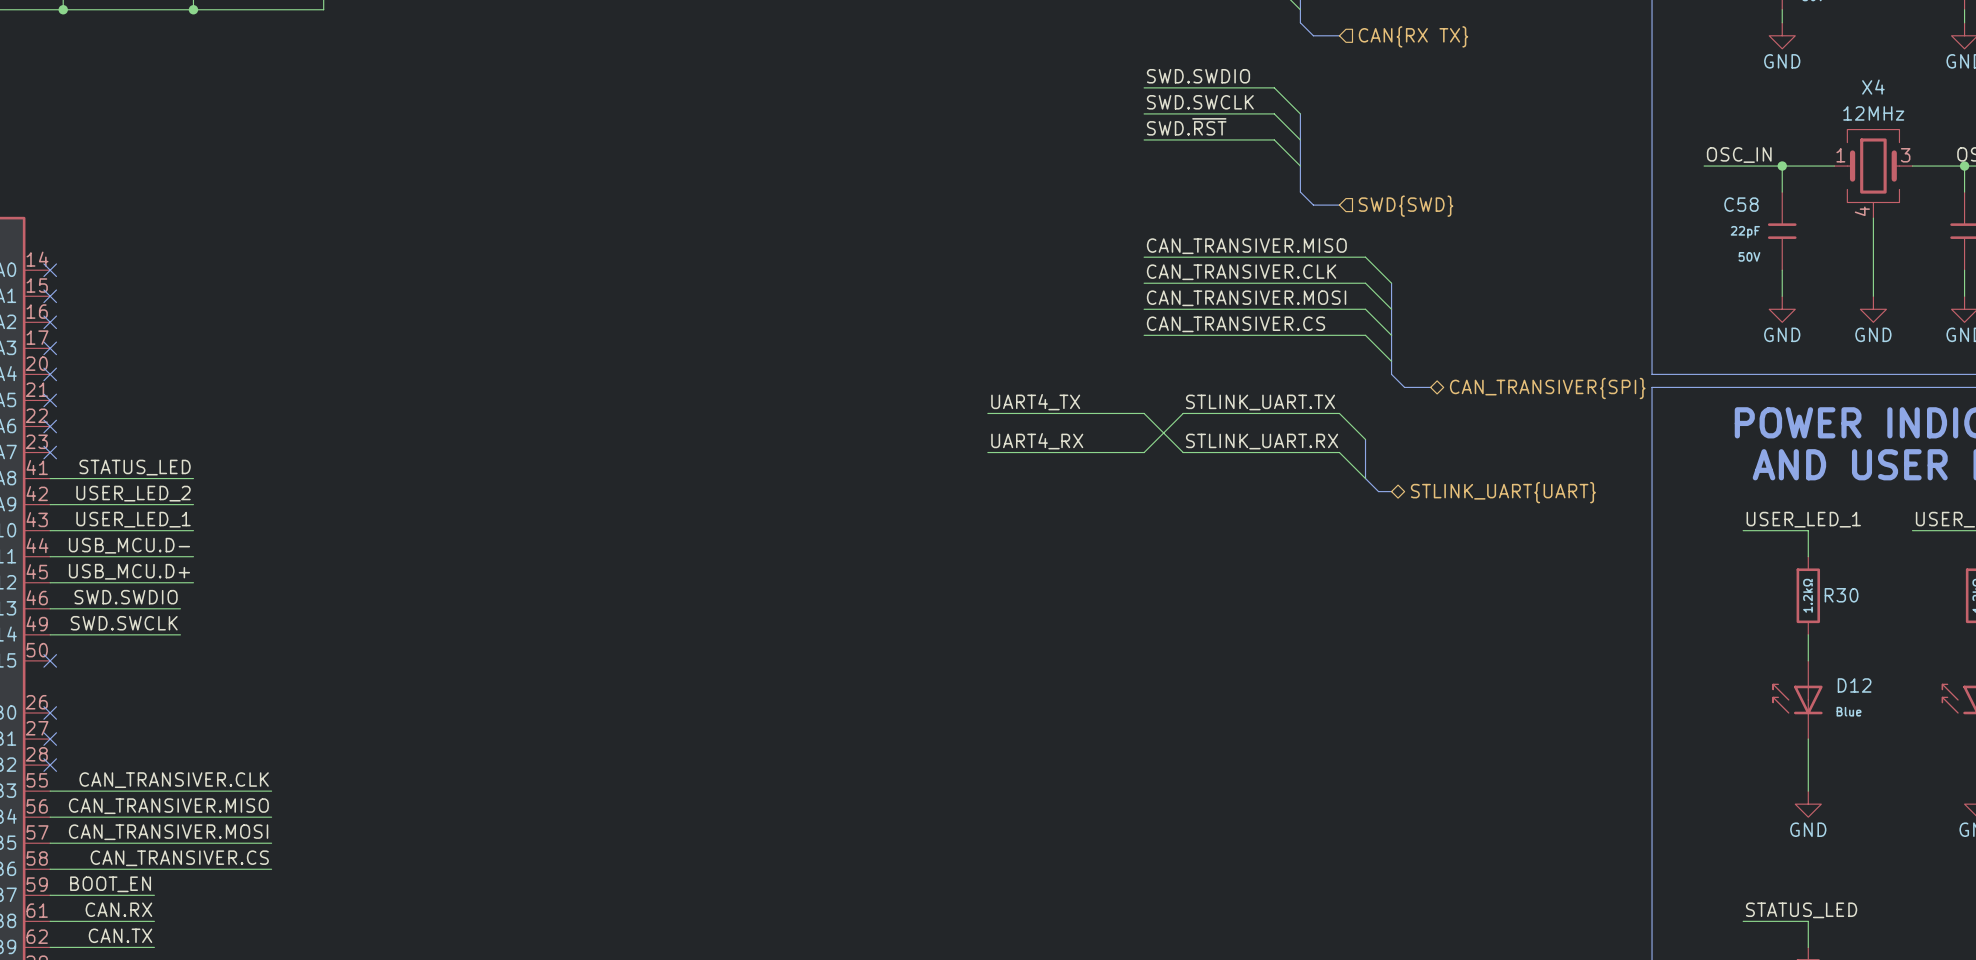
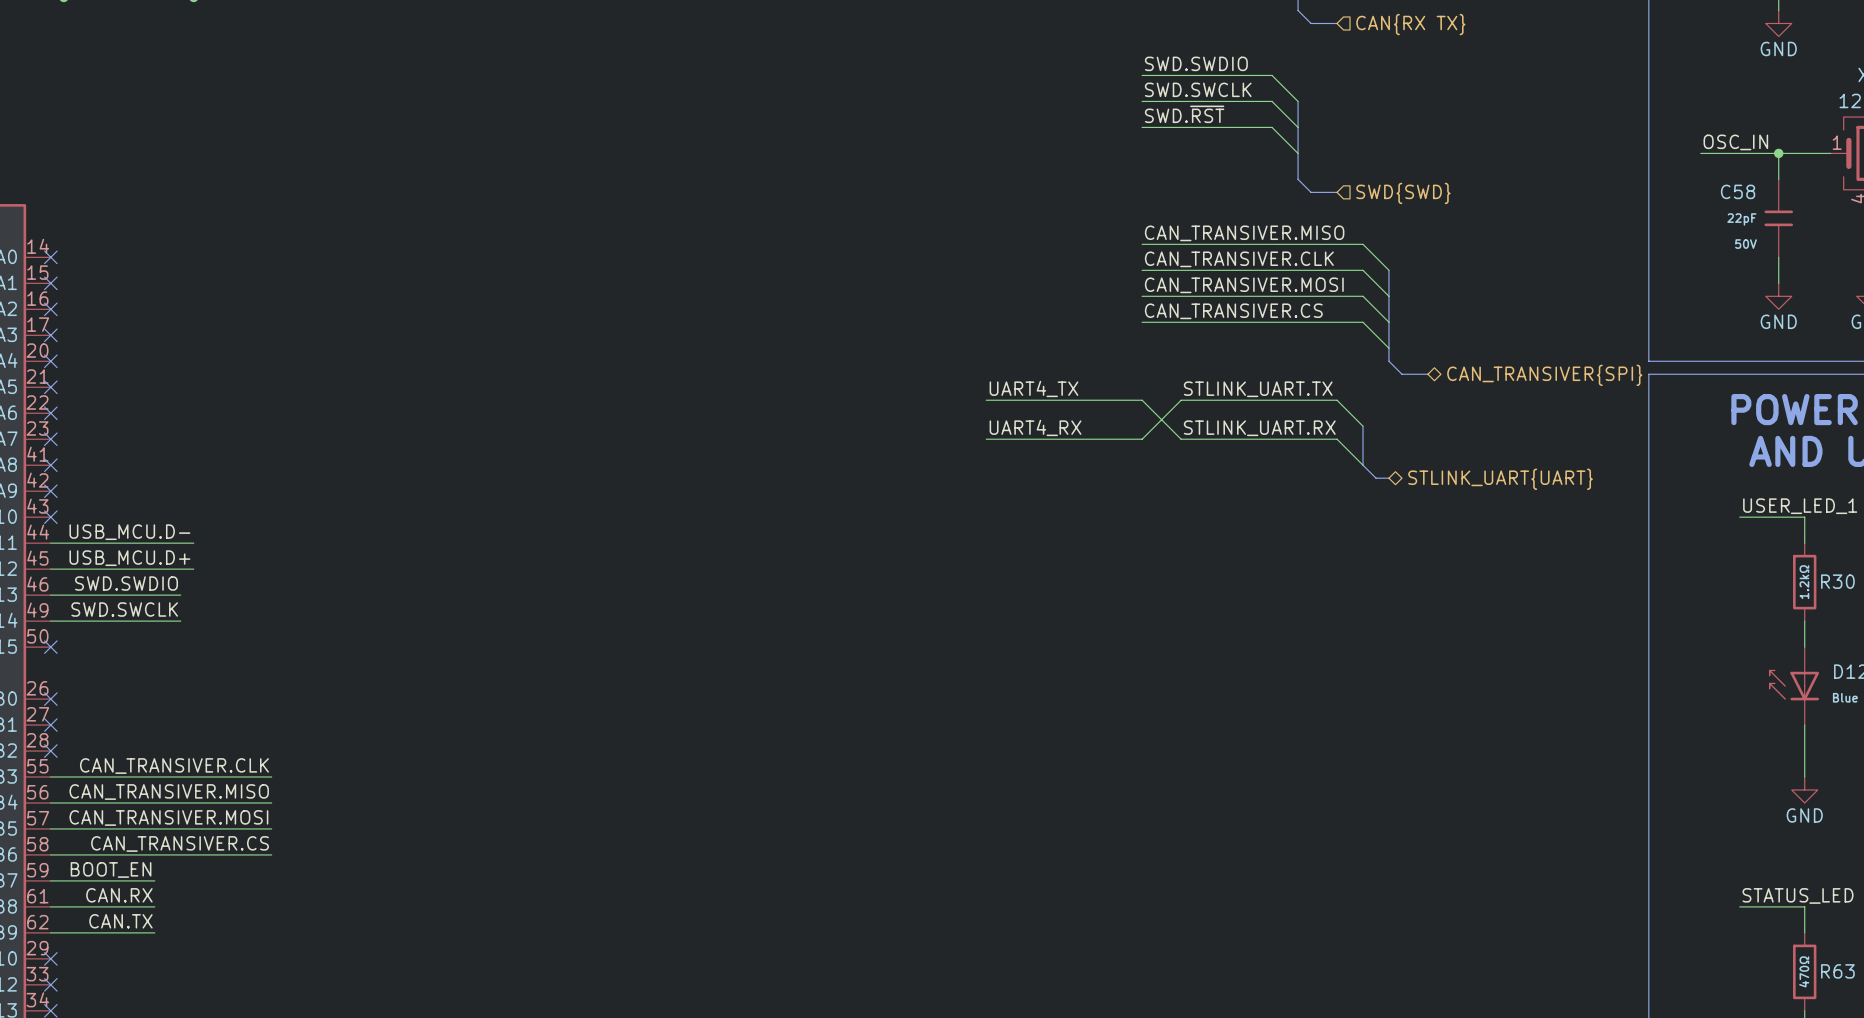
label: STATUS_LED (135, 467) -> none
wire: (50, 478) (193, 478) -> none
no-connect mark: none -> (50, 465)
label: USER_LED_2 (133, 493) -> none
wire: (50, 504) (193, 504) -> none
no-connect mark: none -> (50, 491)
label: USER_LED_1 (133, 519) -> none
wire: (50, 530) (193, 530) -> none
no-connect mark: none -> (50, 517)

